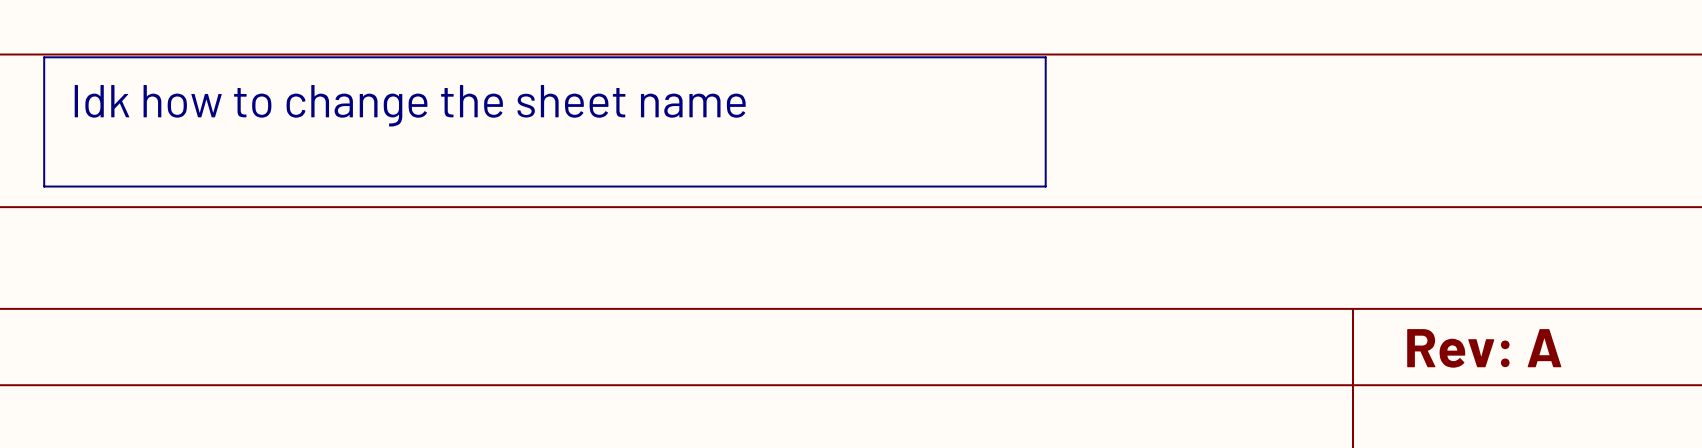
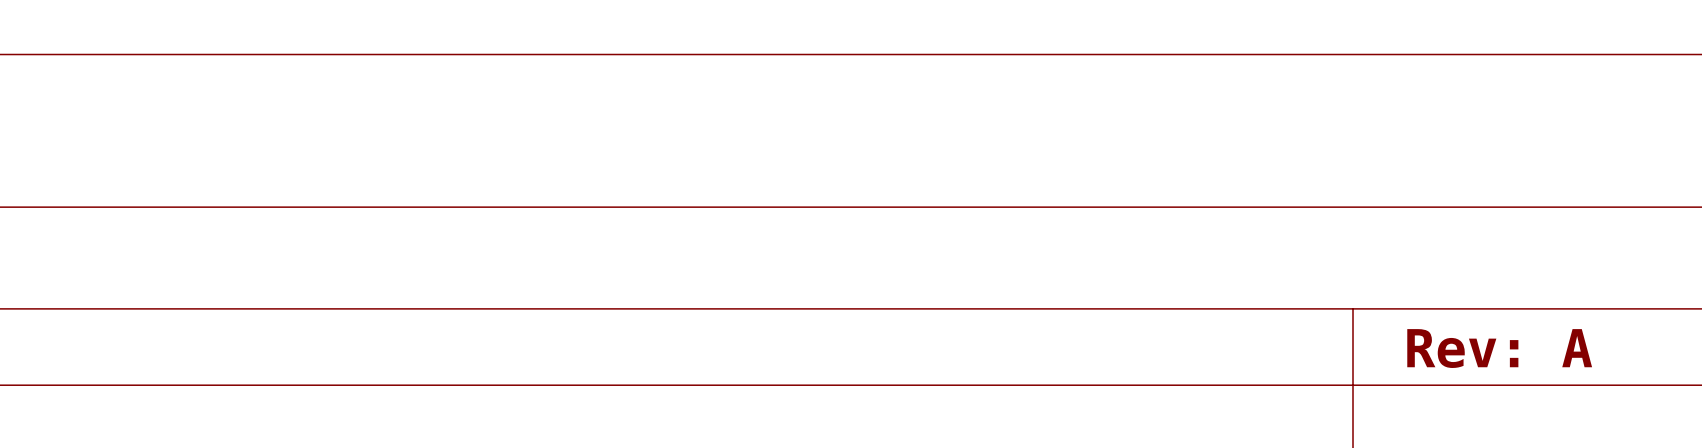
line: (44, 57) (1045, 57) (1045, 186) (44, 186) (44, 57) -> none
text: Idk how to change the sheet name (410, 105) -> none

